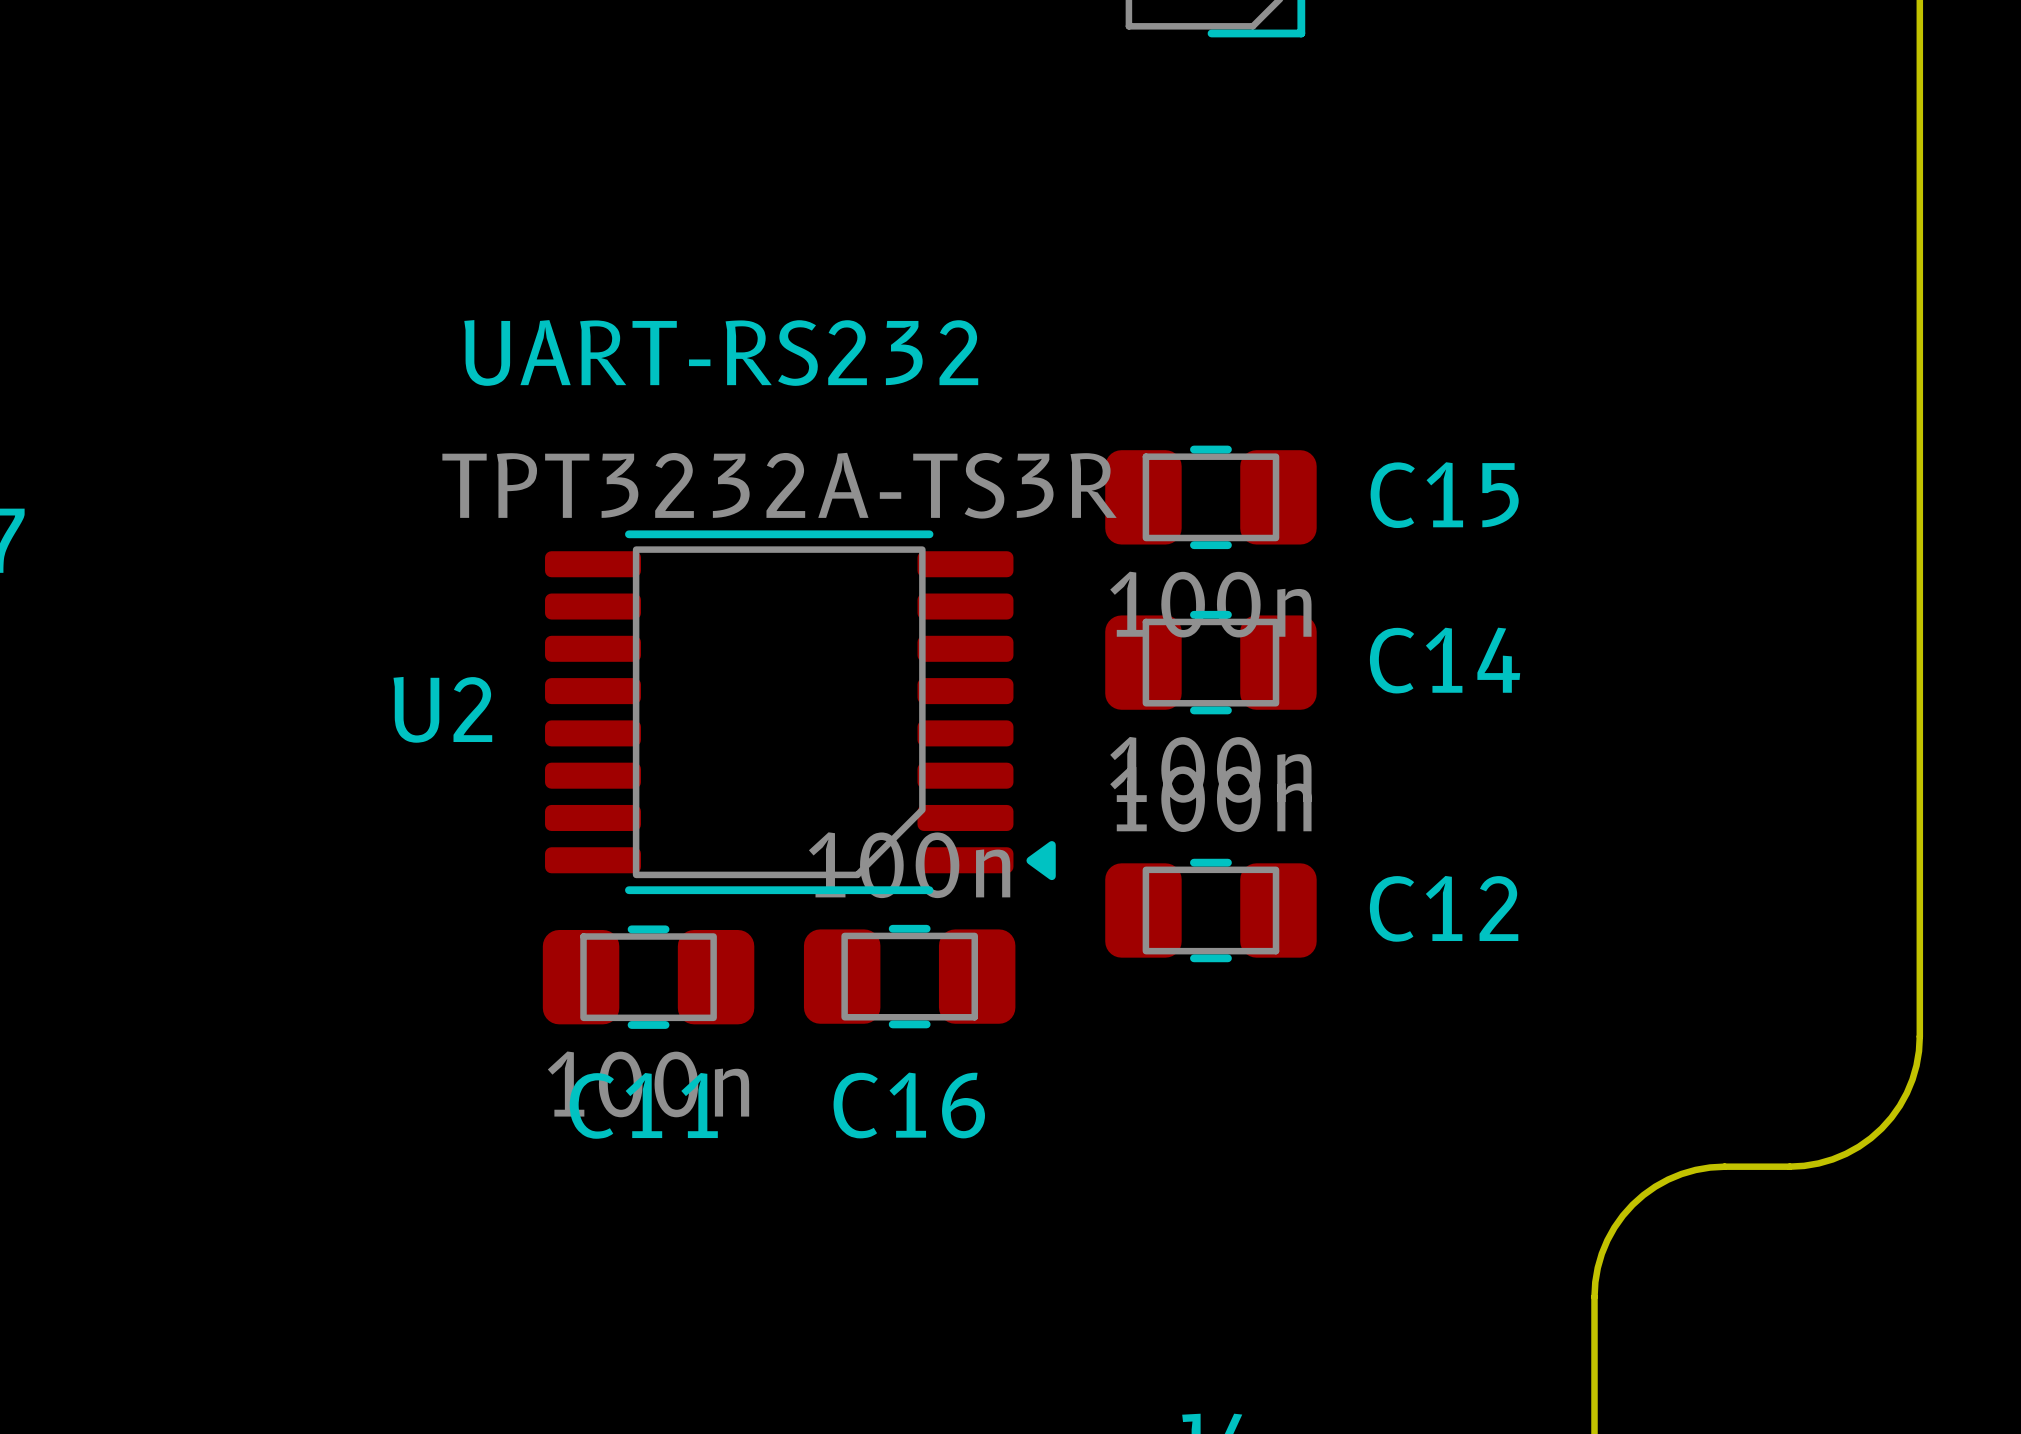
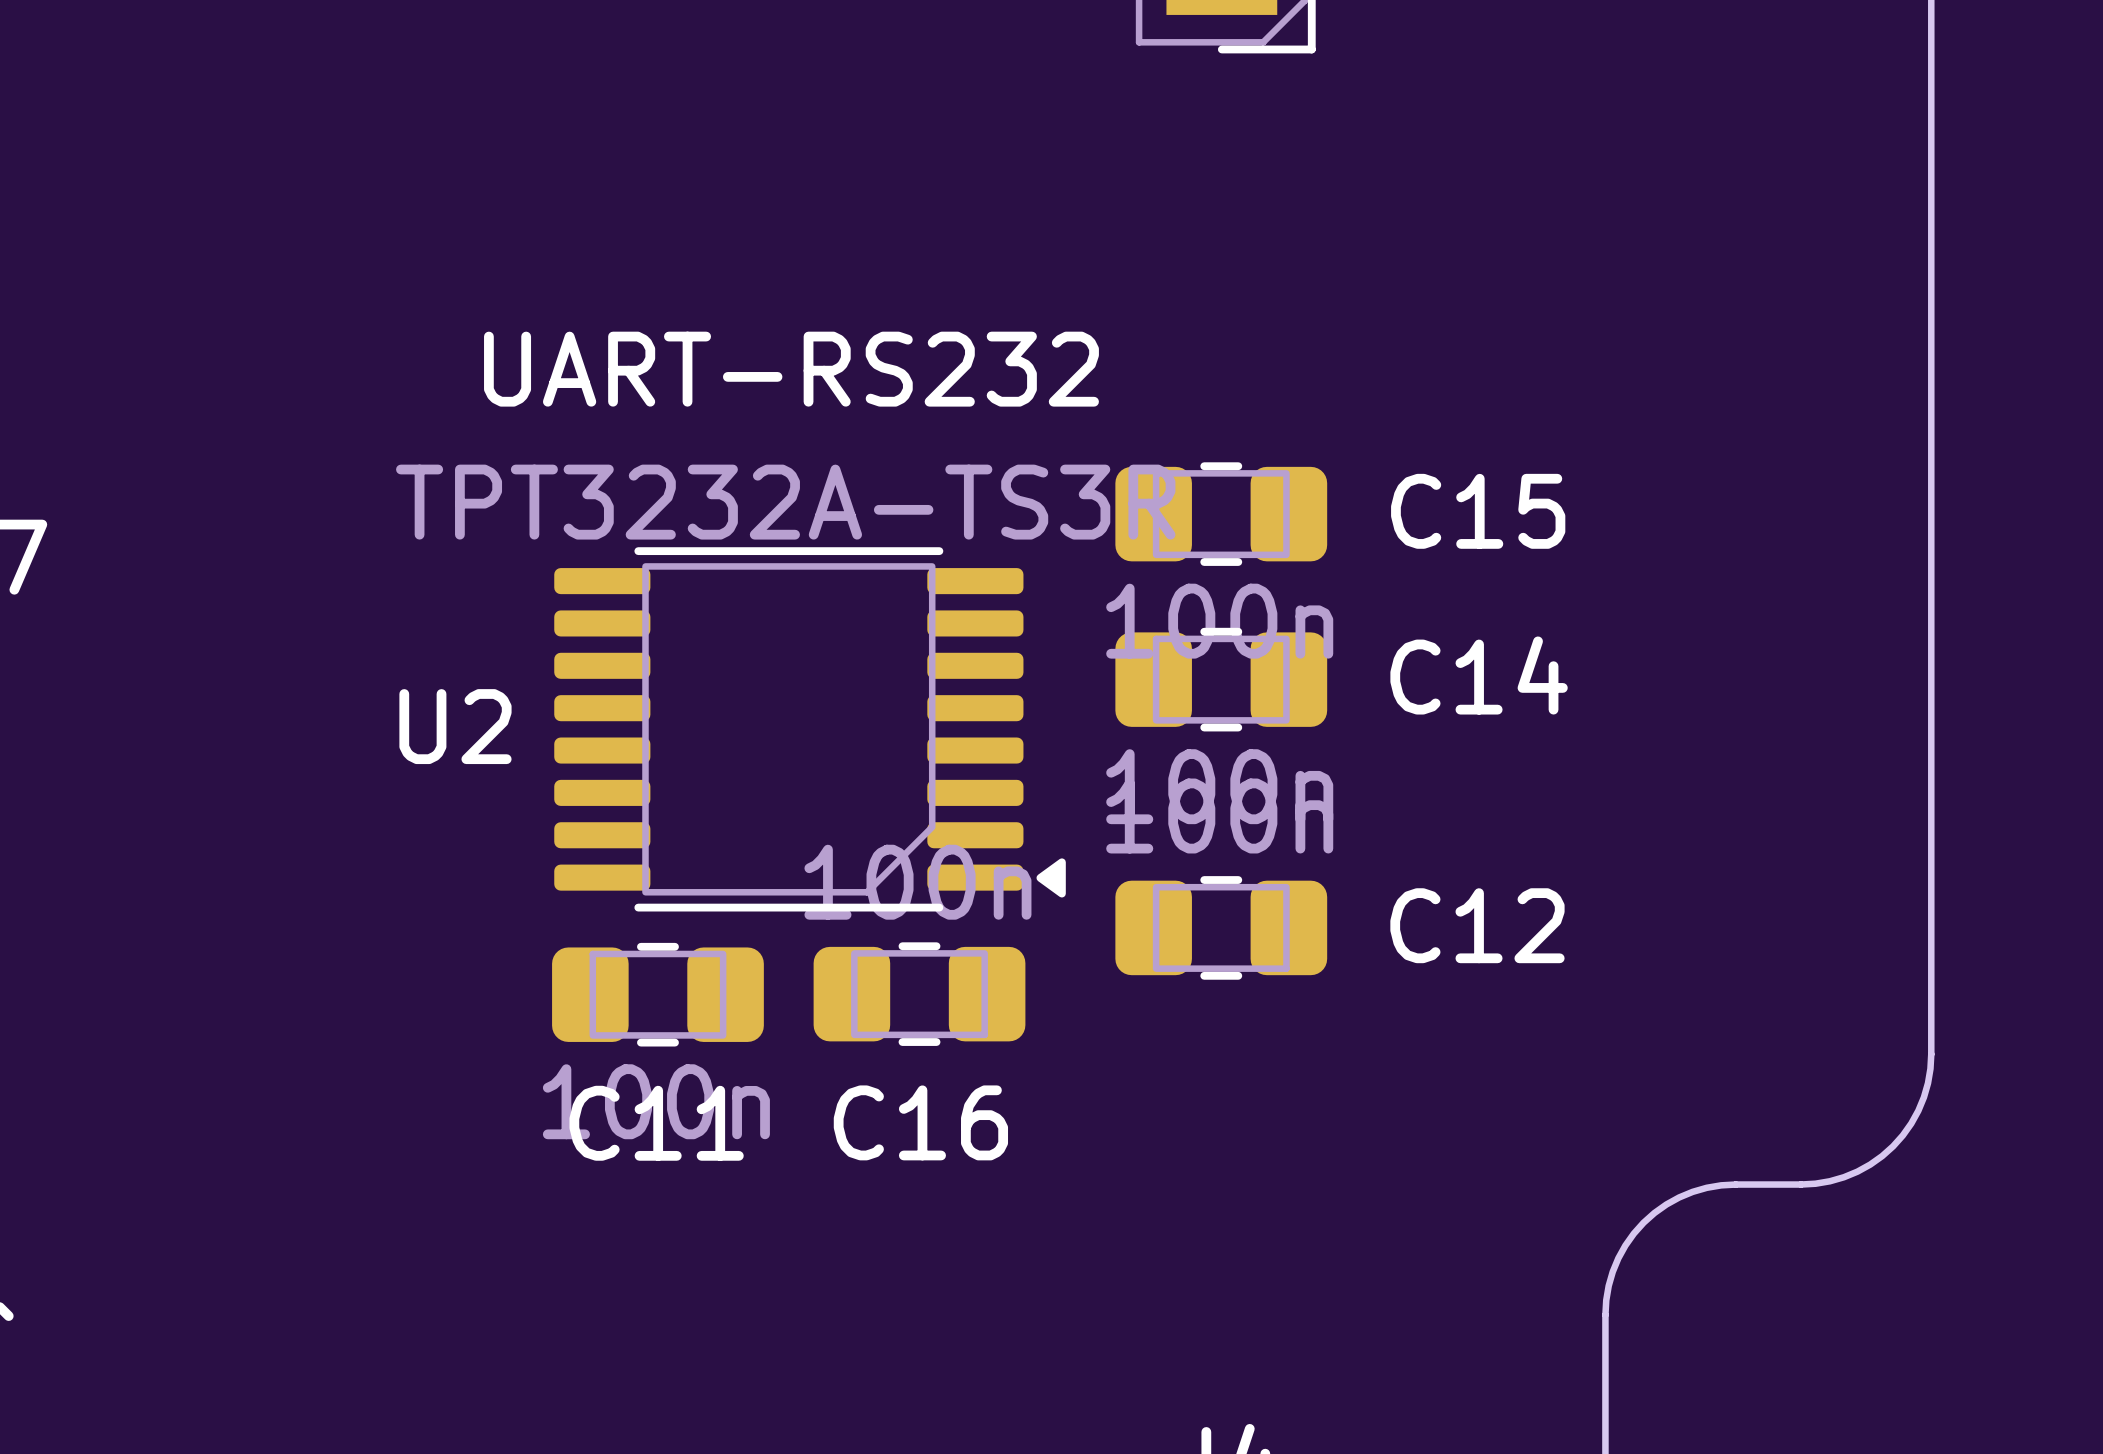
C15 name position: C15 (1444, 495) -> C15 (1478, 511)
C14 name position: C14 (1445, 660) -> C14 (1479, 675)
C12 name position: C12 (1444, 908) -> C12 (1477, 925)

